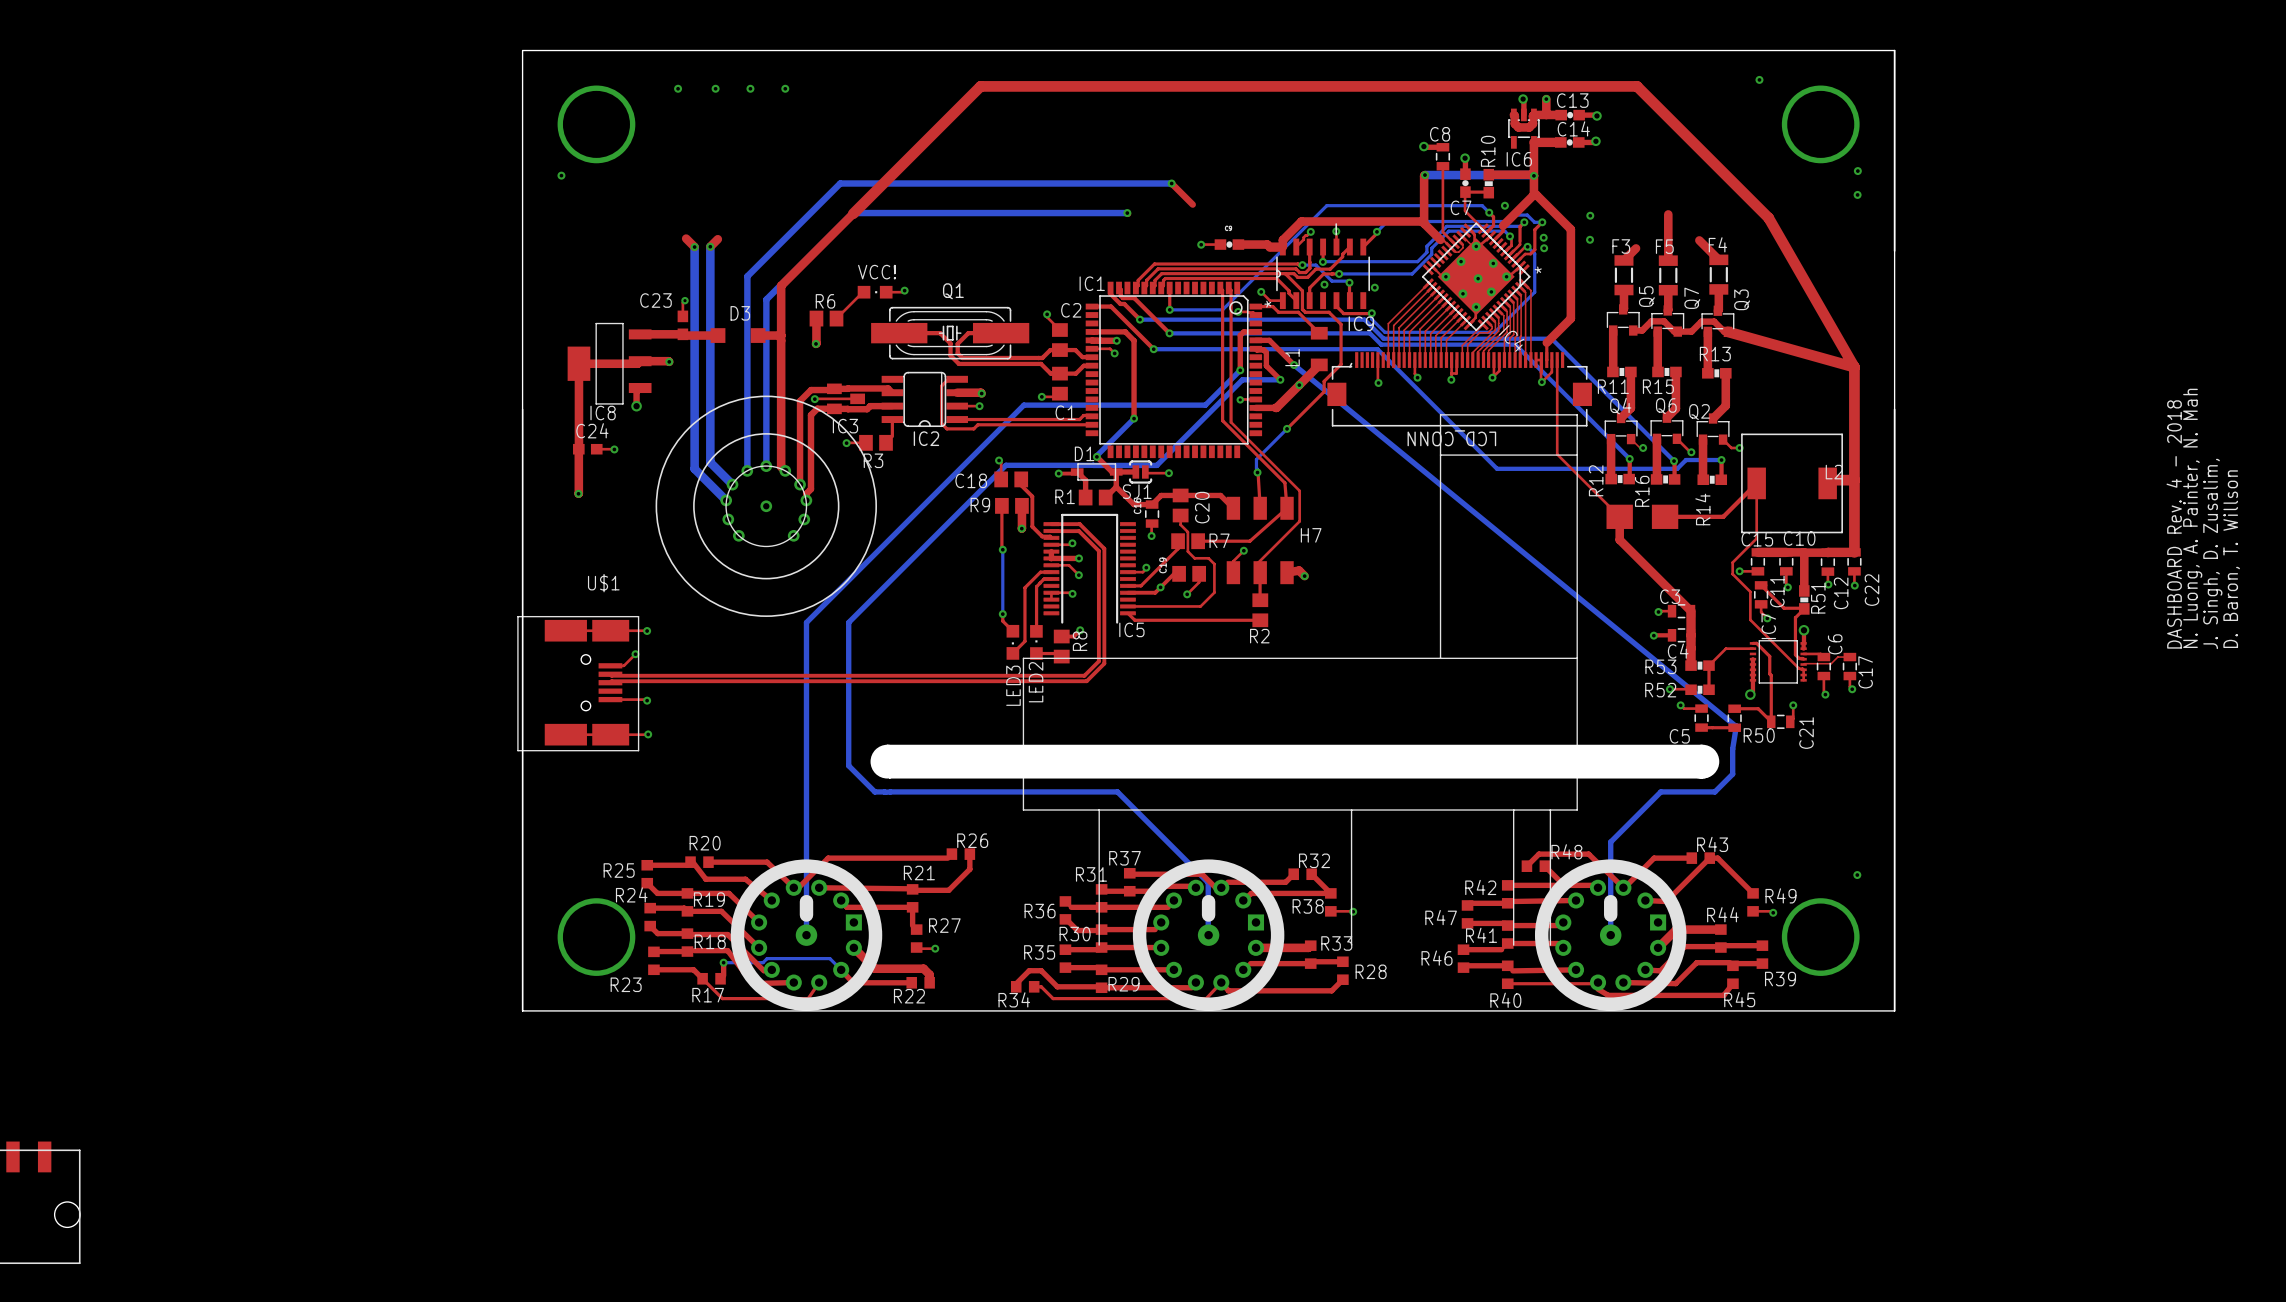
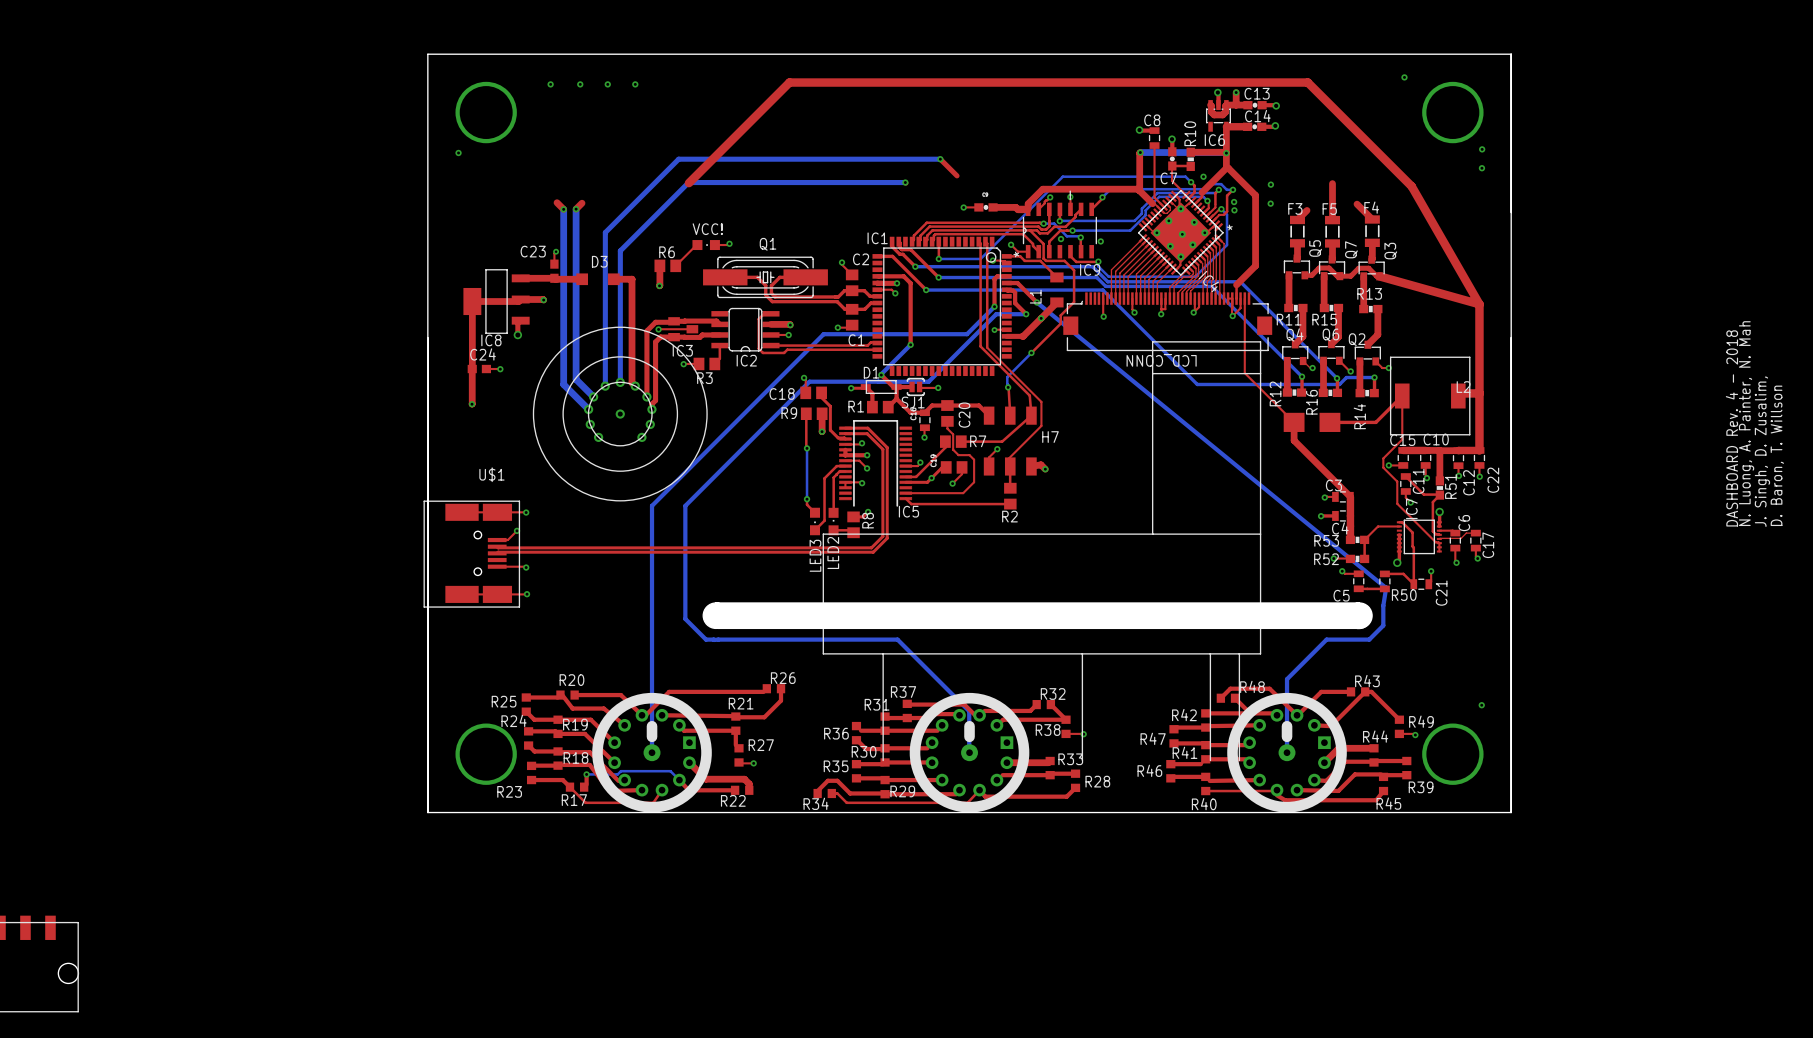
top track: (853, 213) (781, 285) (781, 335) -> none

